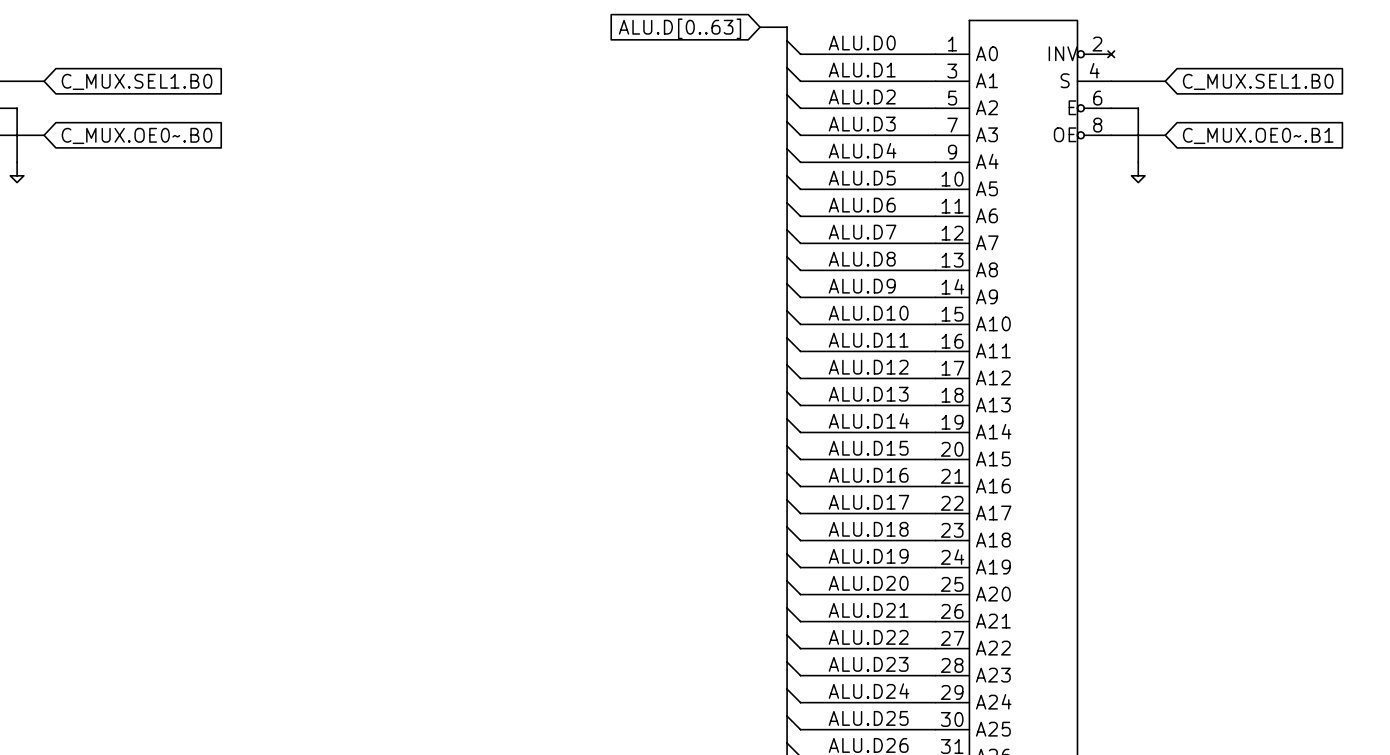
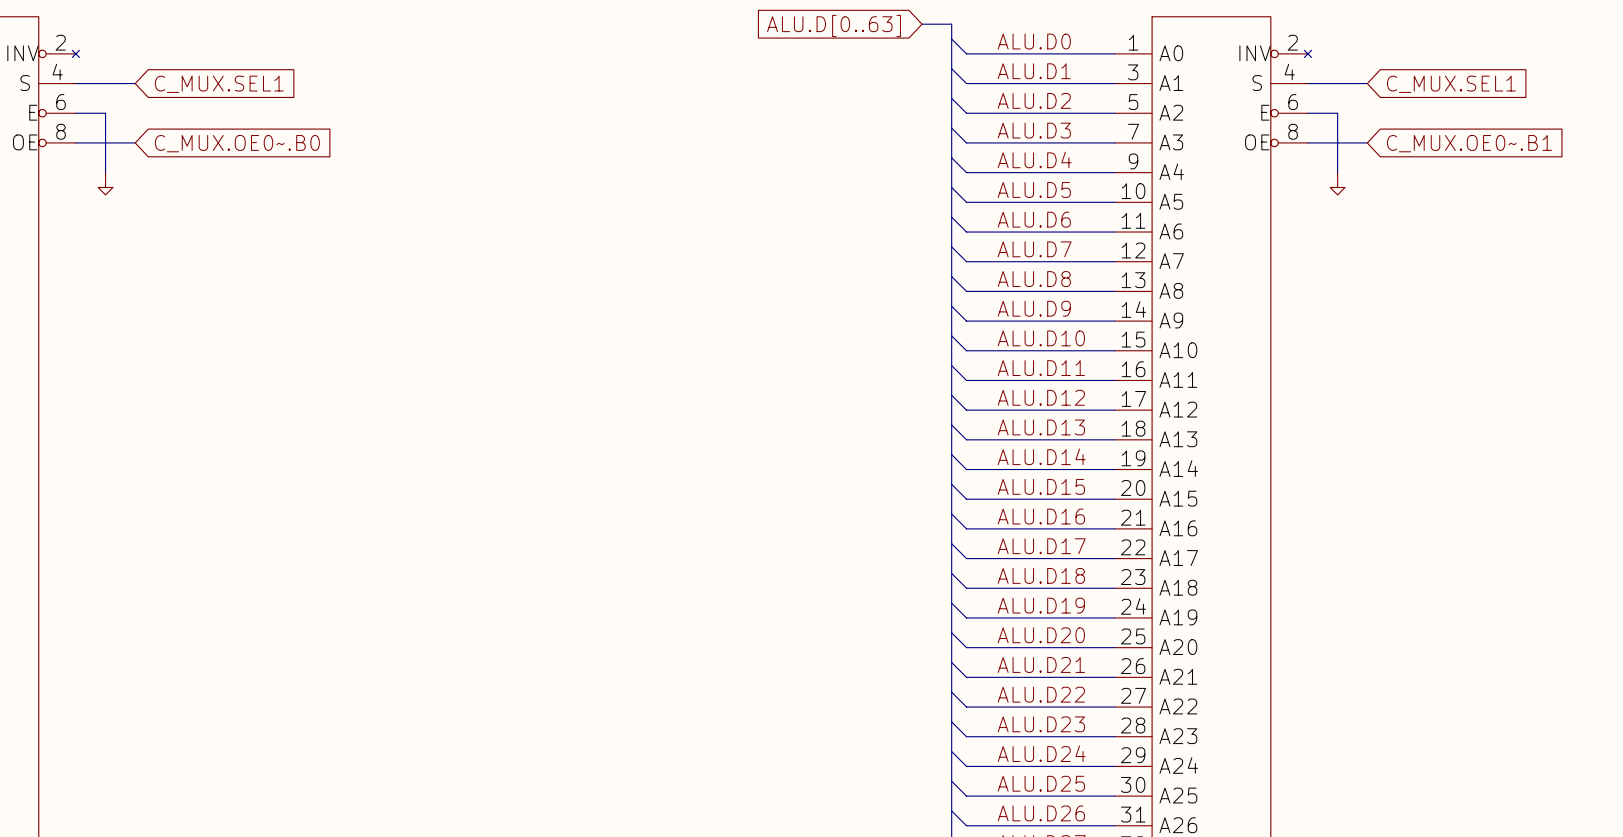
global label: C_MUX.SEL1.B0 (137, 81) -> C_MUX.SEL1 (219, 84)
global label: C_MUX.SEL1.B0 (1258, 81) -> C_MUX.SEL1 (1451, 84)

